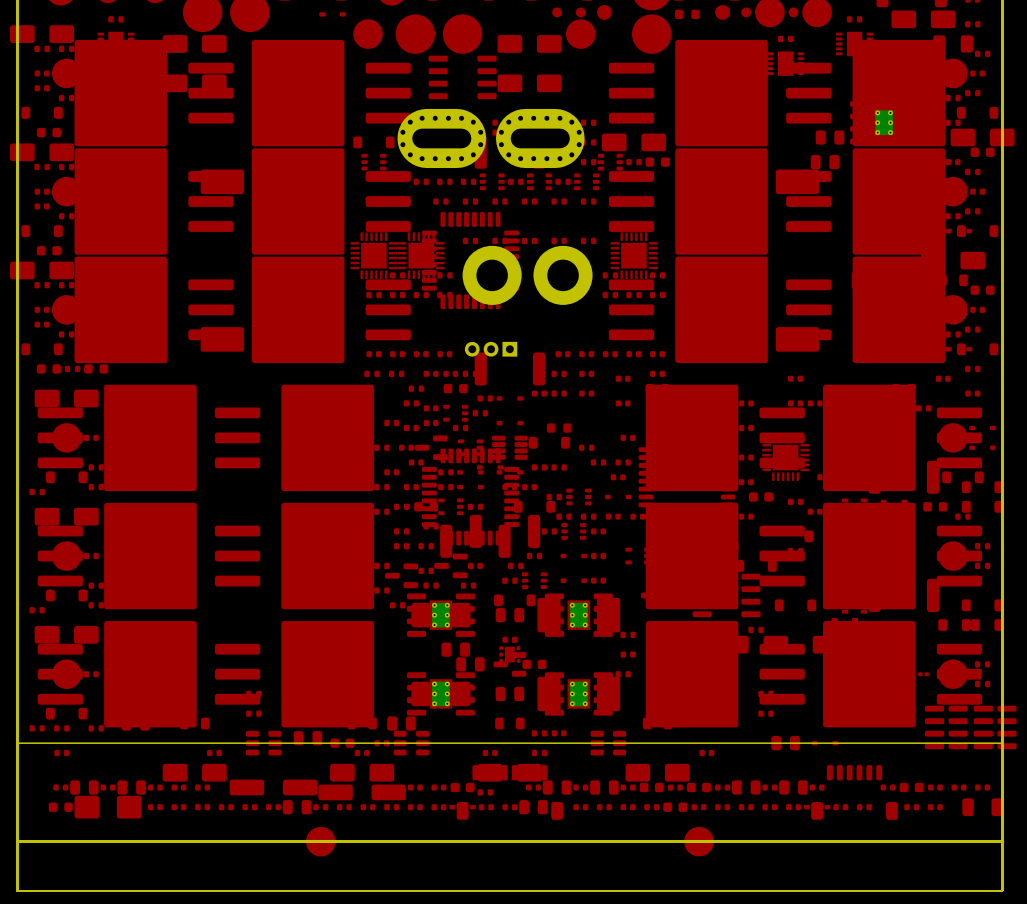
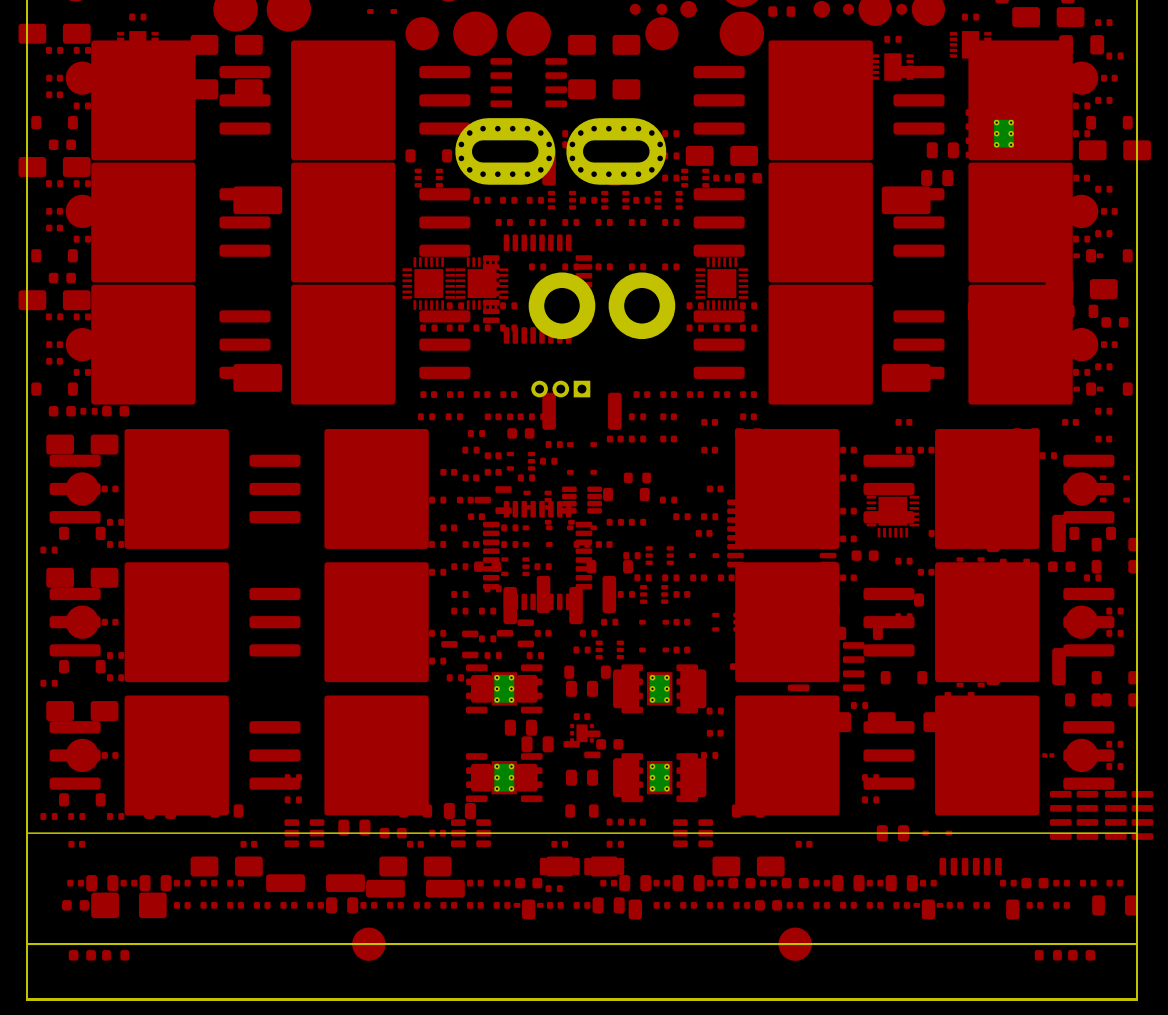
part: (982, 152) -> none
part: none -> (82, 955)
part: none -> (115, 955)
part: none -> (1048, 955)
part: none -> (1081, 955)

